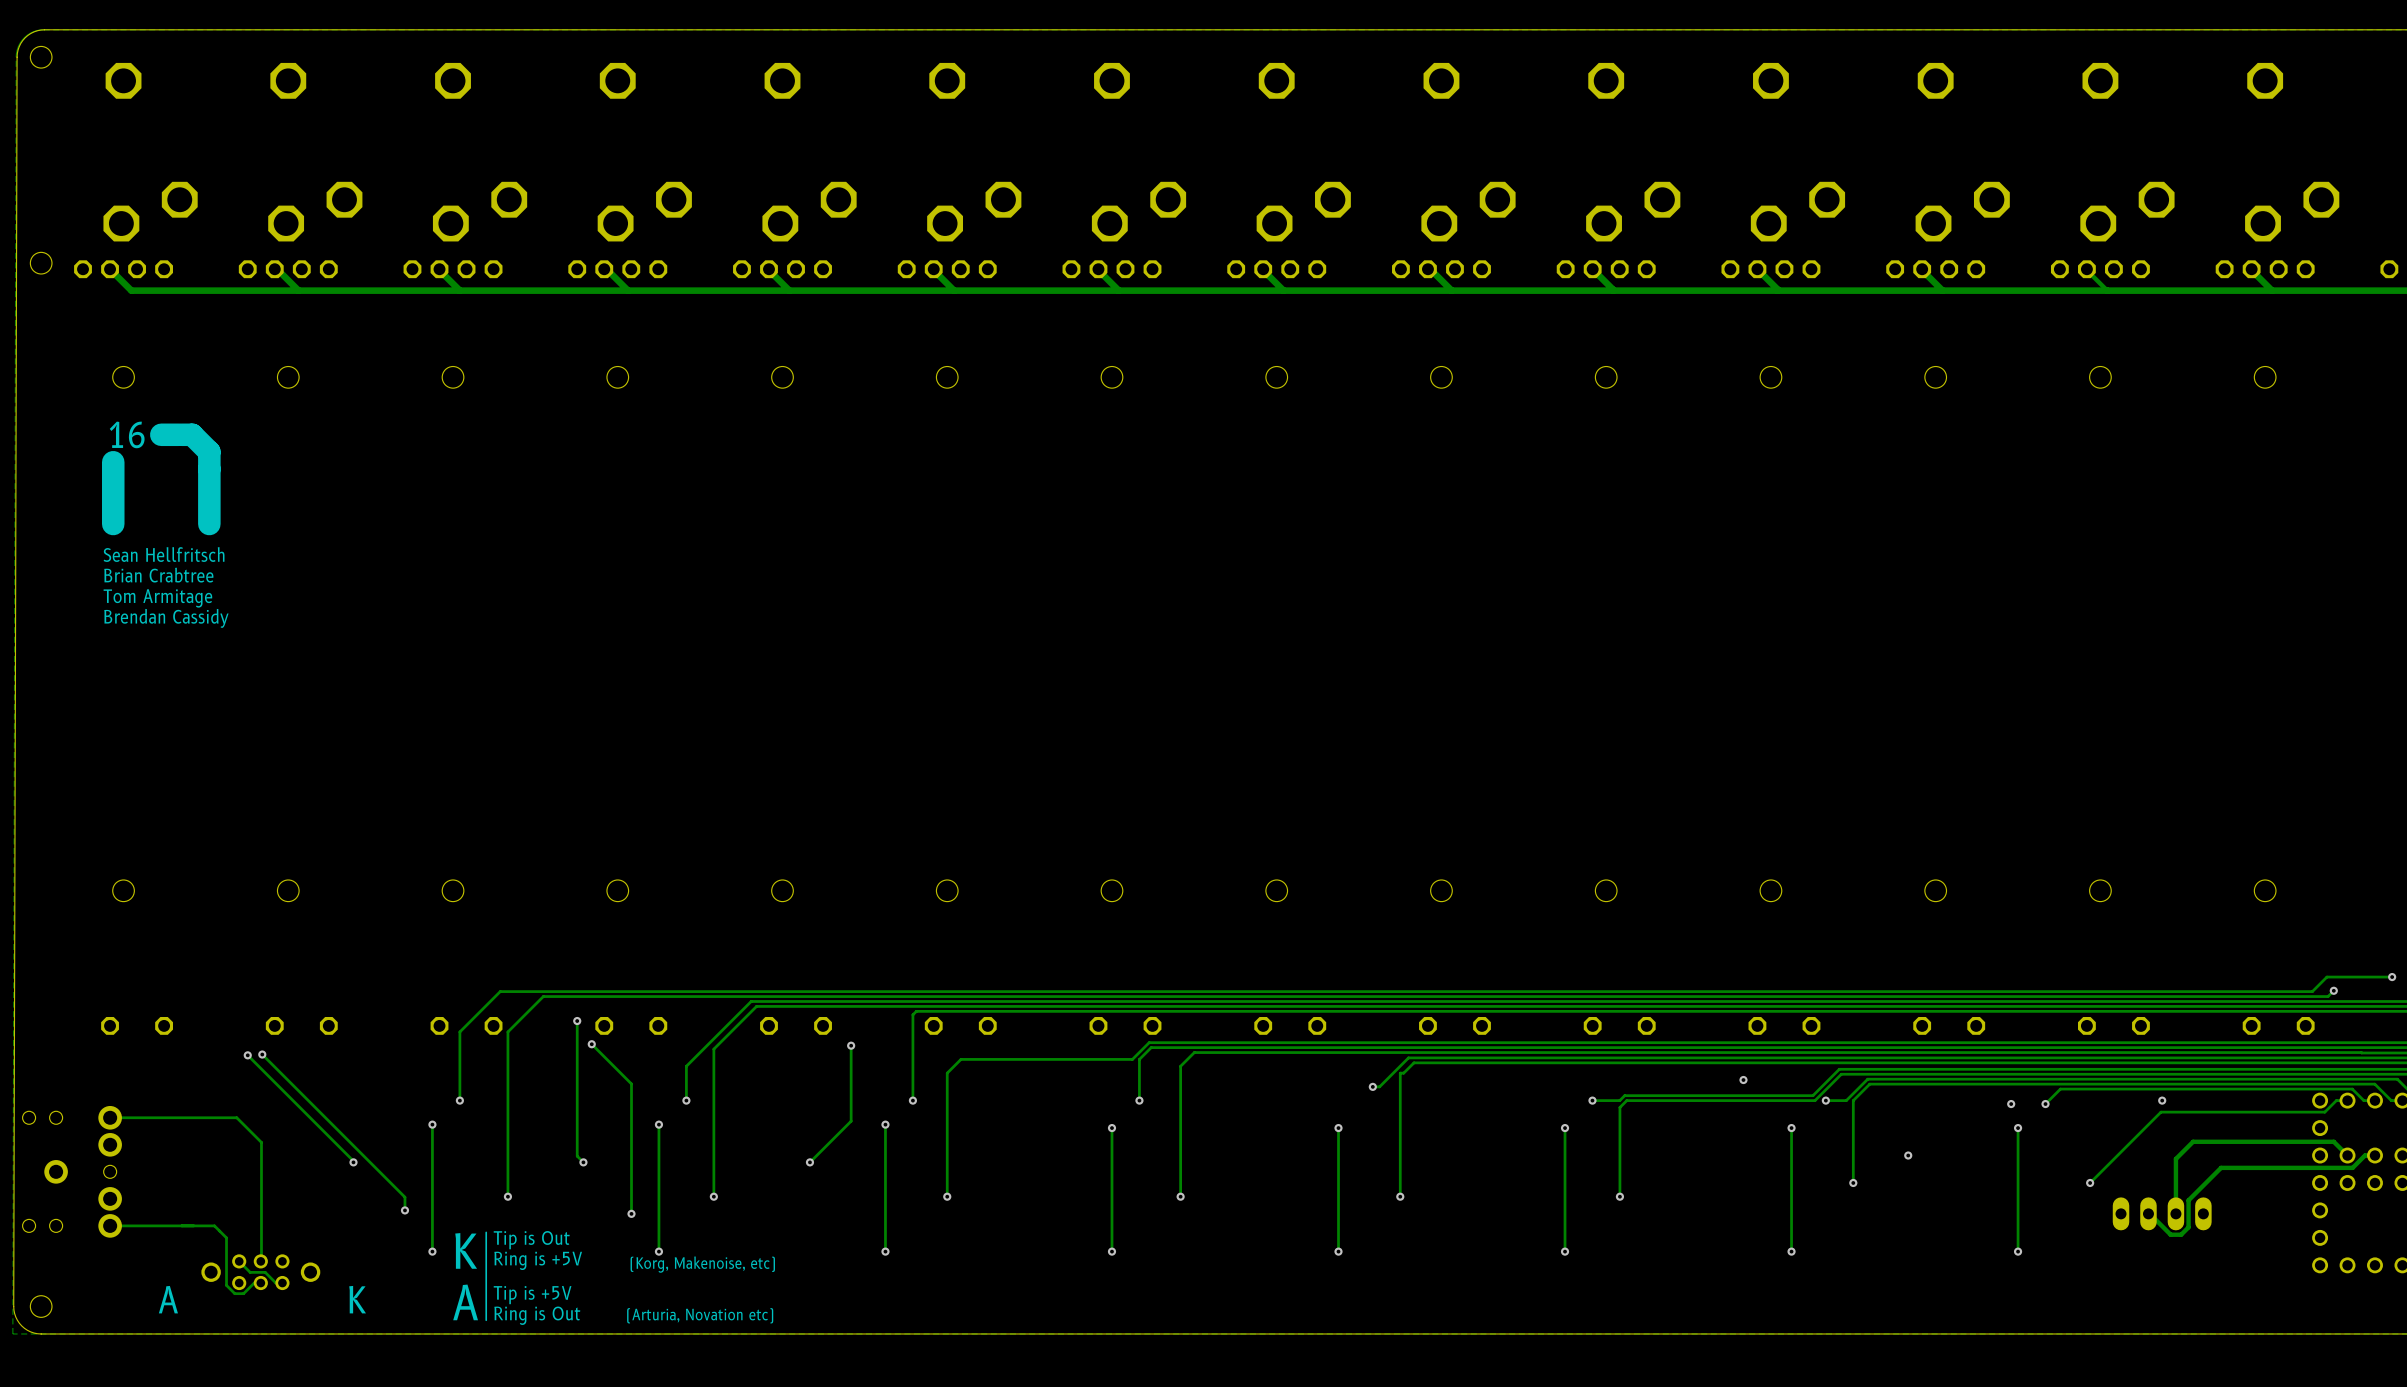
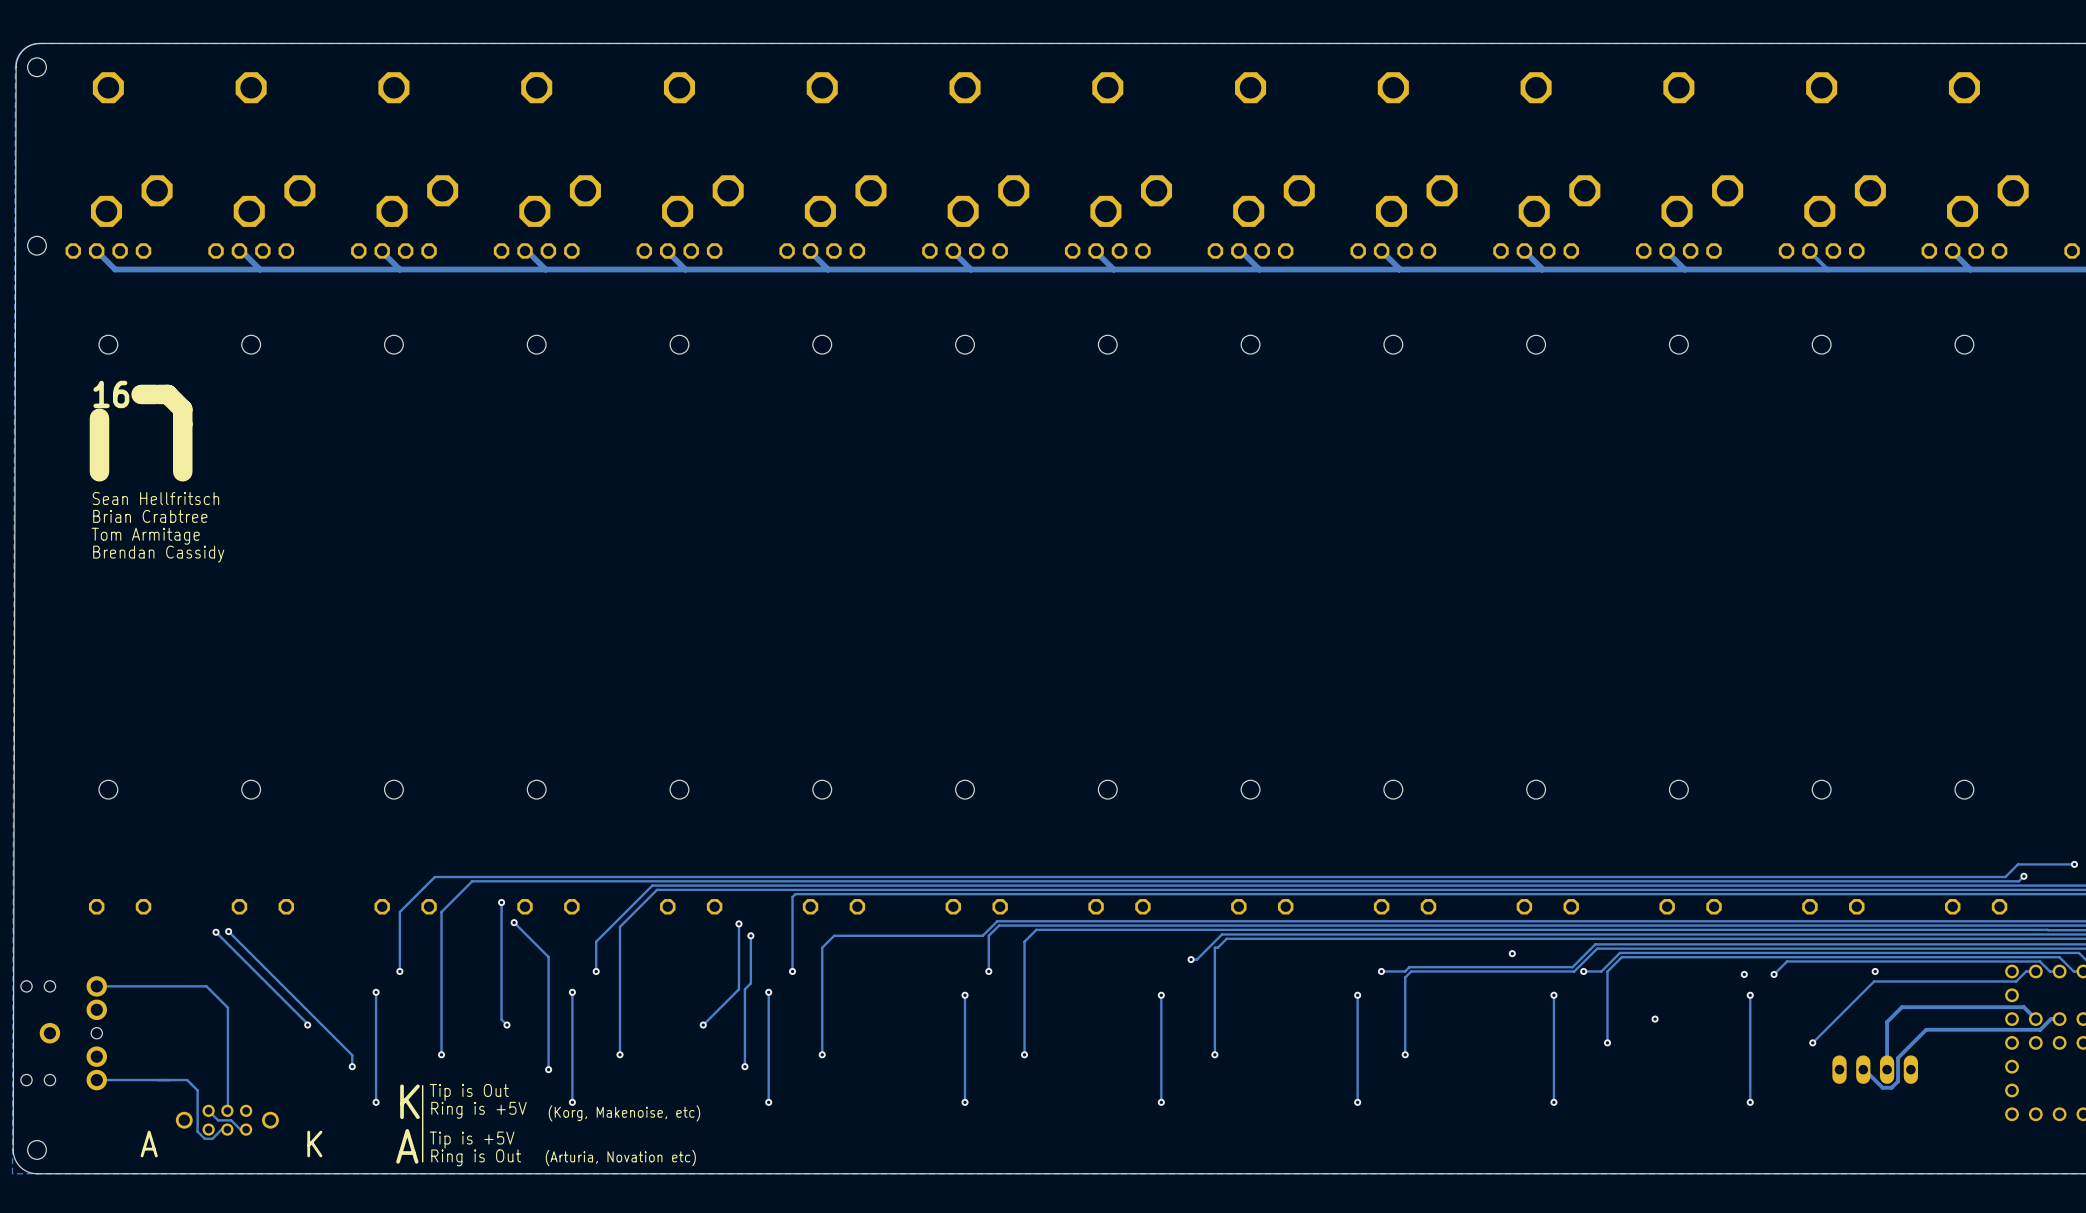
track: none -> (750, 935) (750, 983) (744, 989) (744, 1066)
via: none -> (750, 935)
via: none -> (744, 1066)

